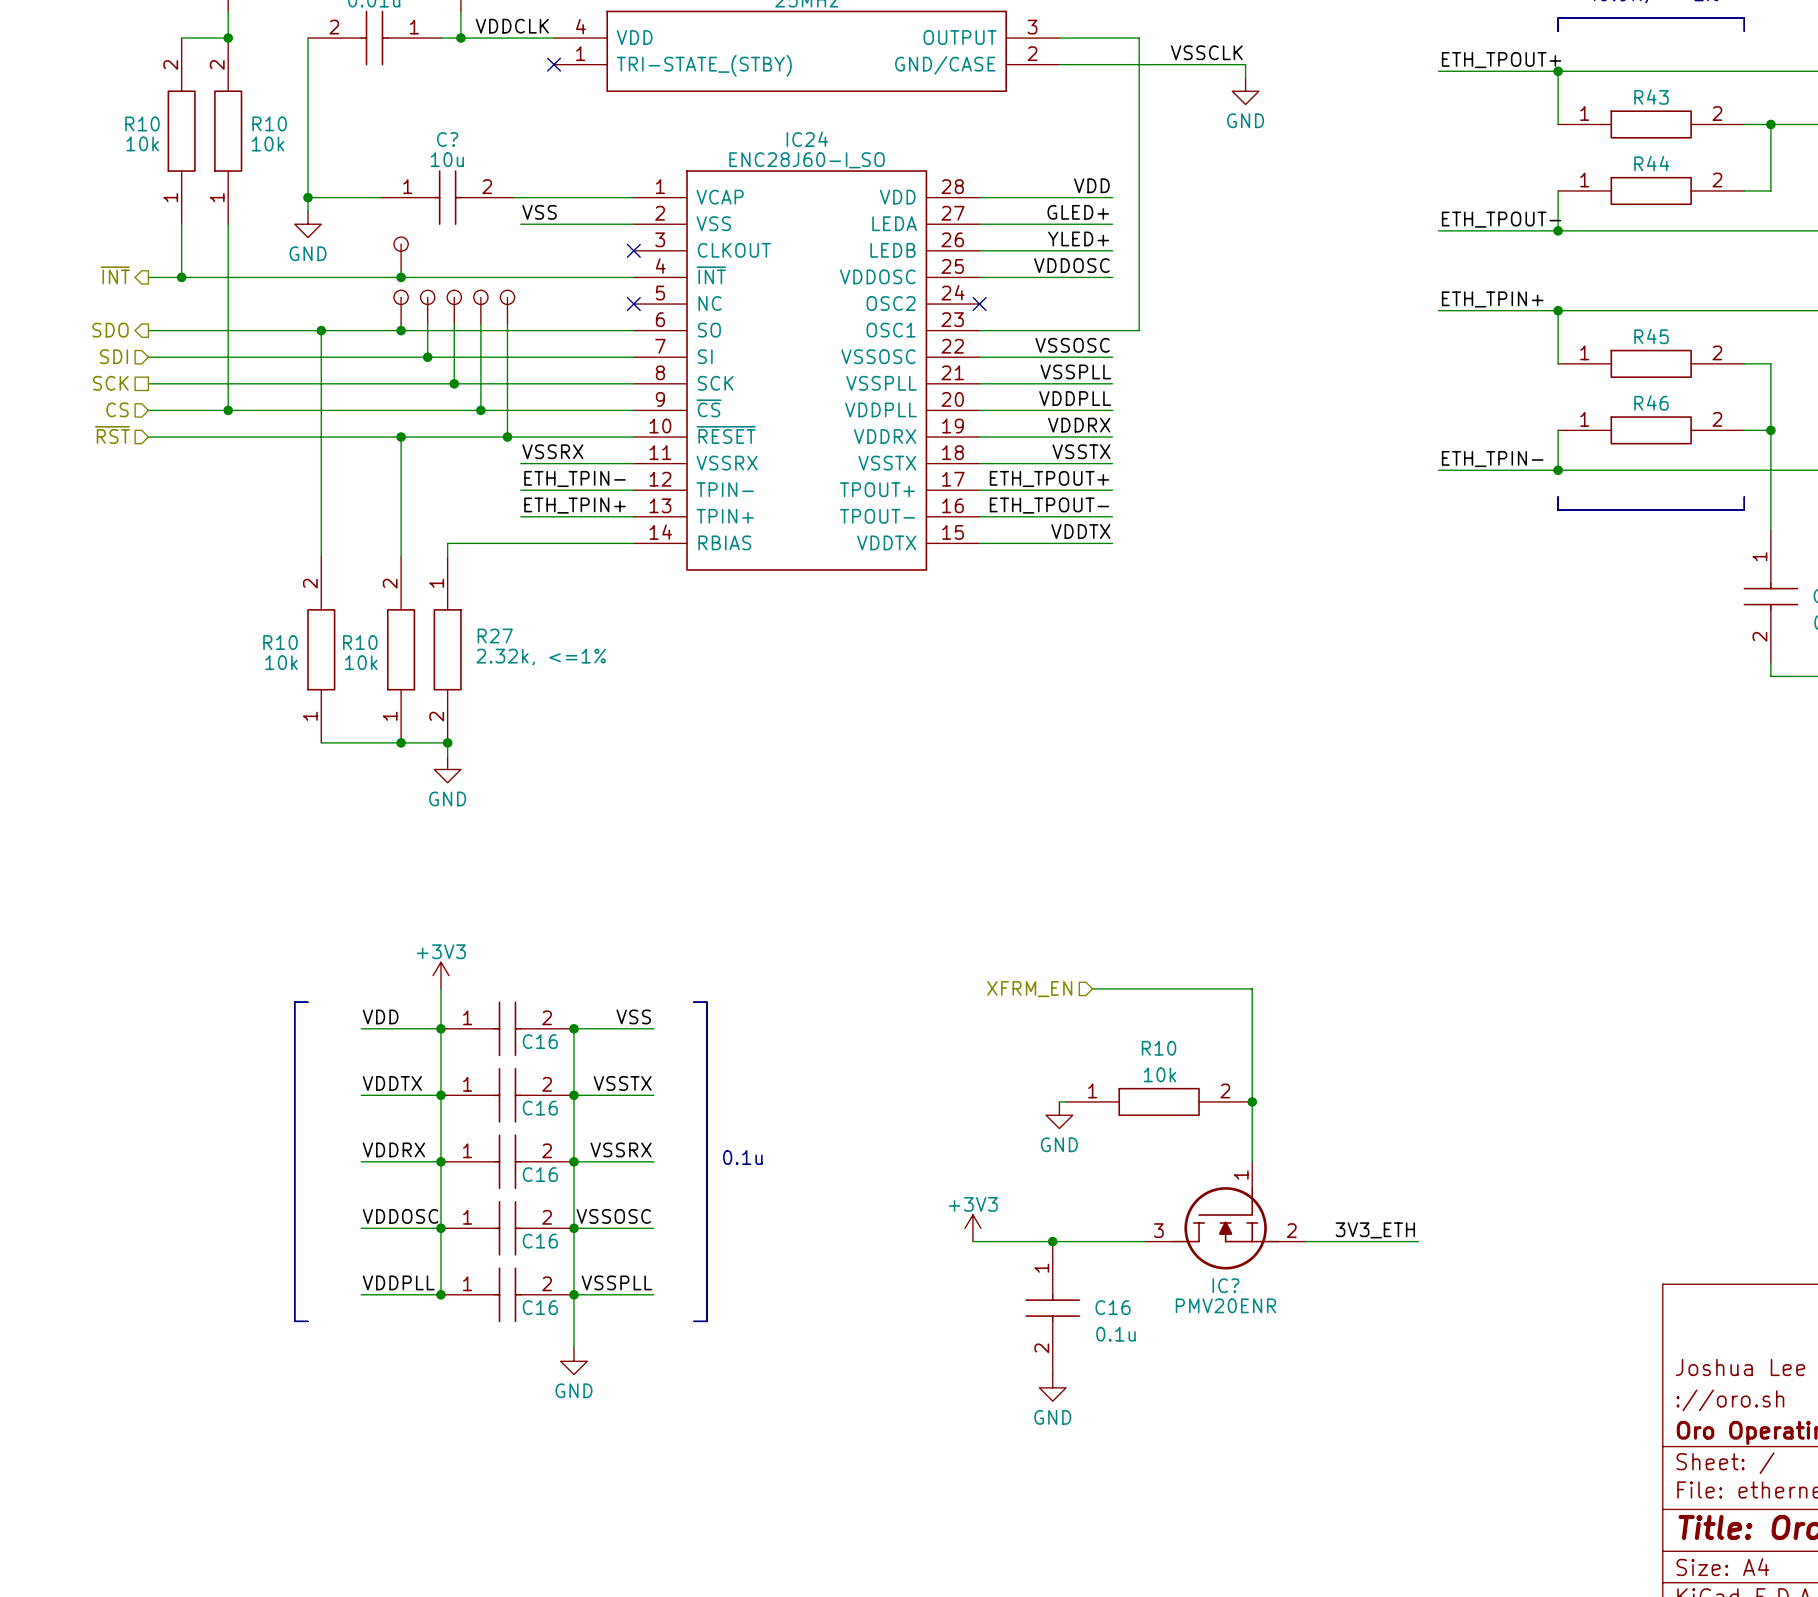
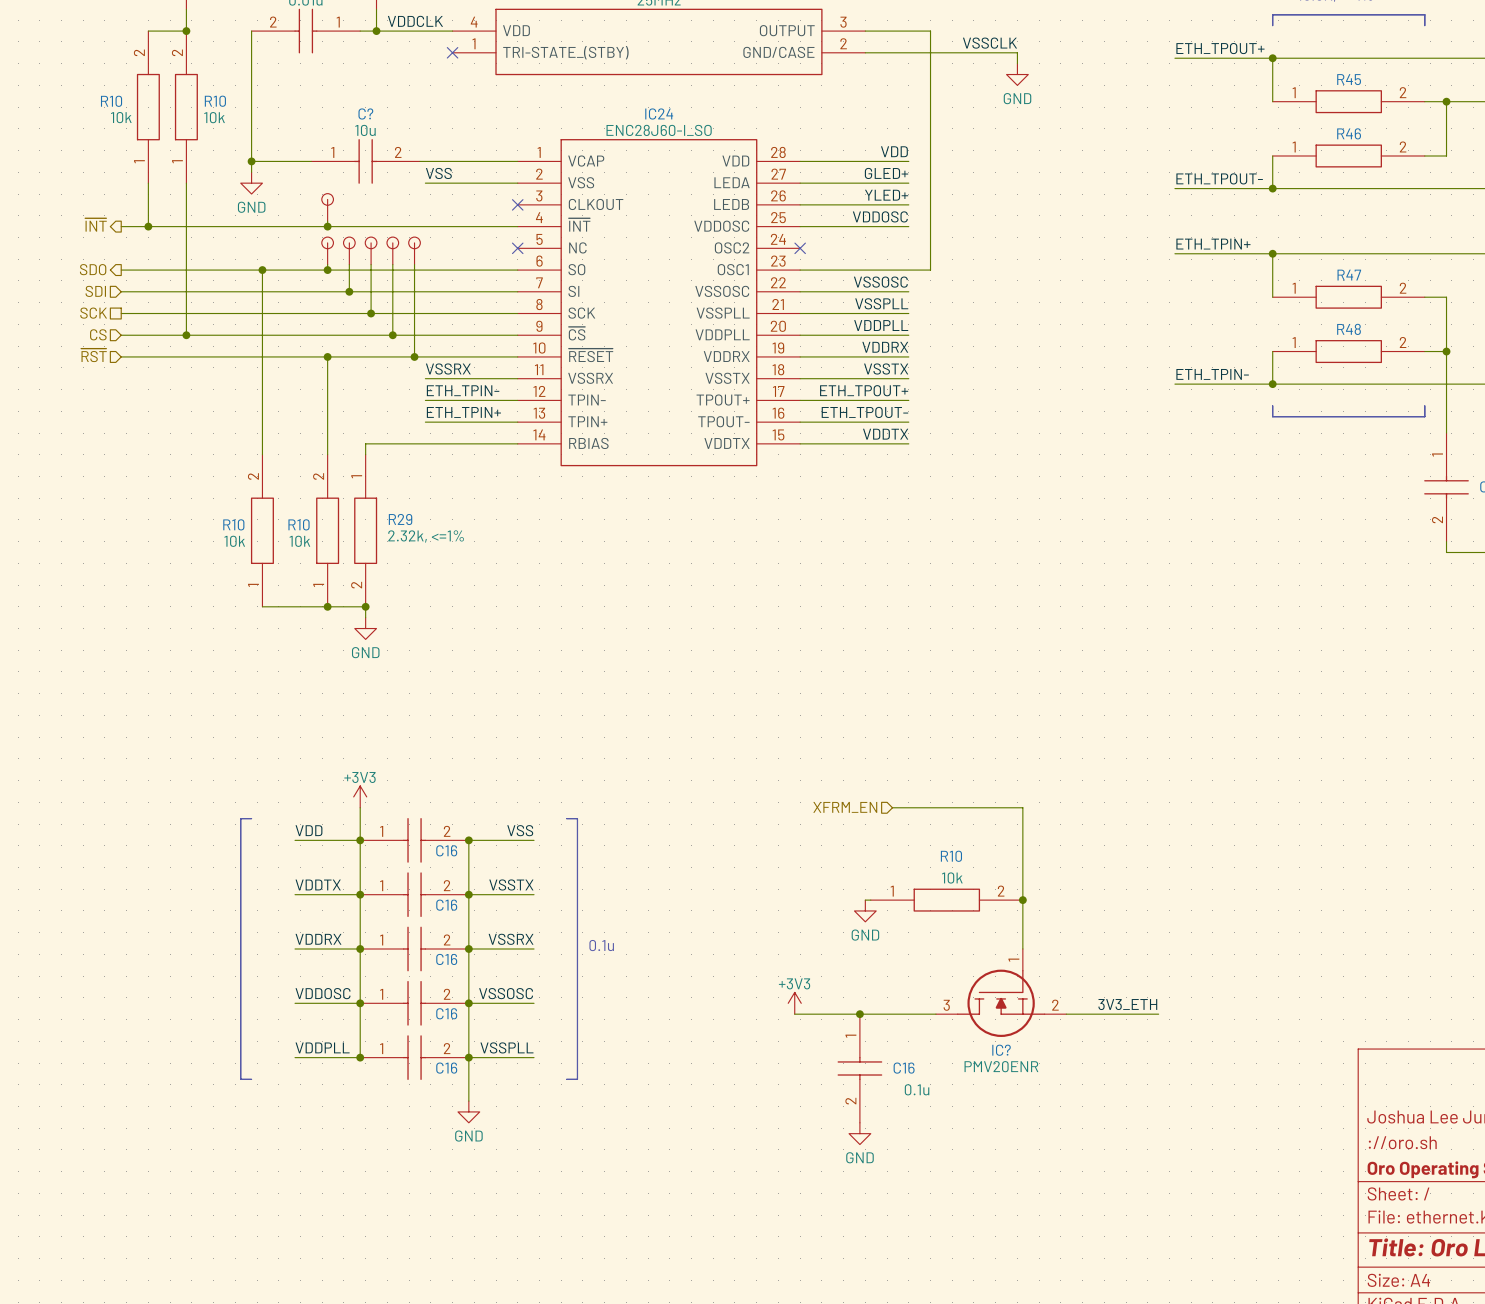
R43 name: R43 (1651, 97) -> R45 (1349, 79)
R44 name: R44 (1651, 163) -> R46 (1349, 133)
R45 name: R45 (1651, 336) -> R47 (1349, 275)
R46 name: R46 (1651, 402) -> R48 (1349, 329)
R27 name: R27 (495, 636) -> R29 (400, 519)

